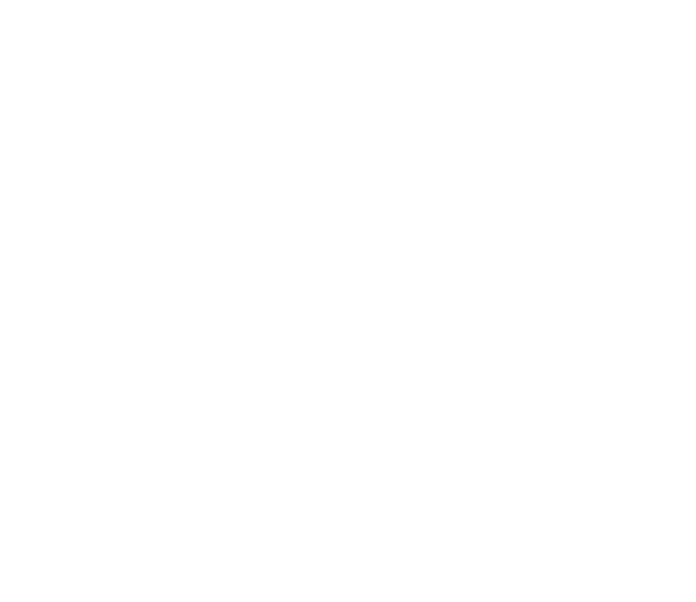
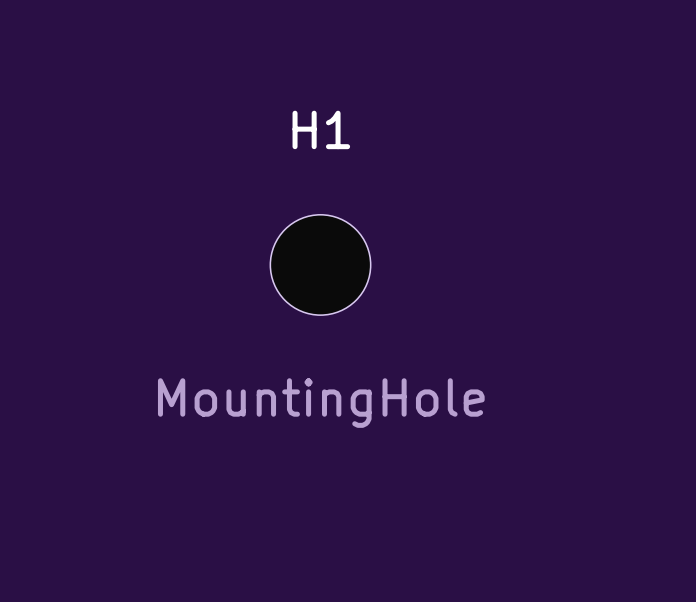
H1: none -> MountingHole (320, 264)

